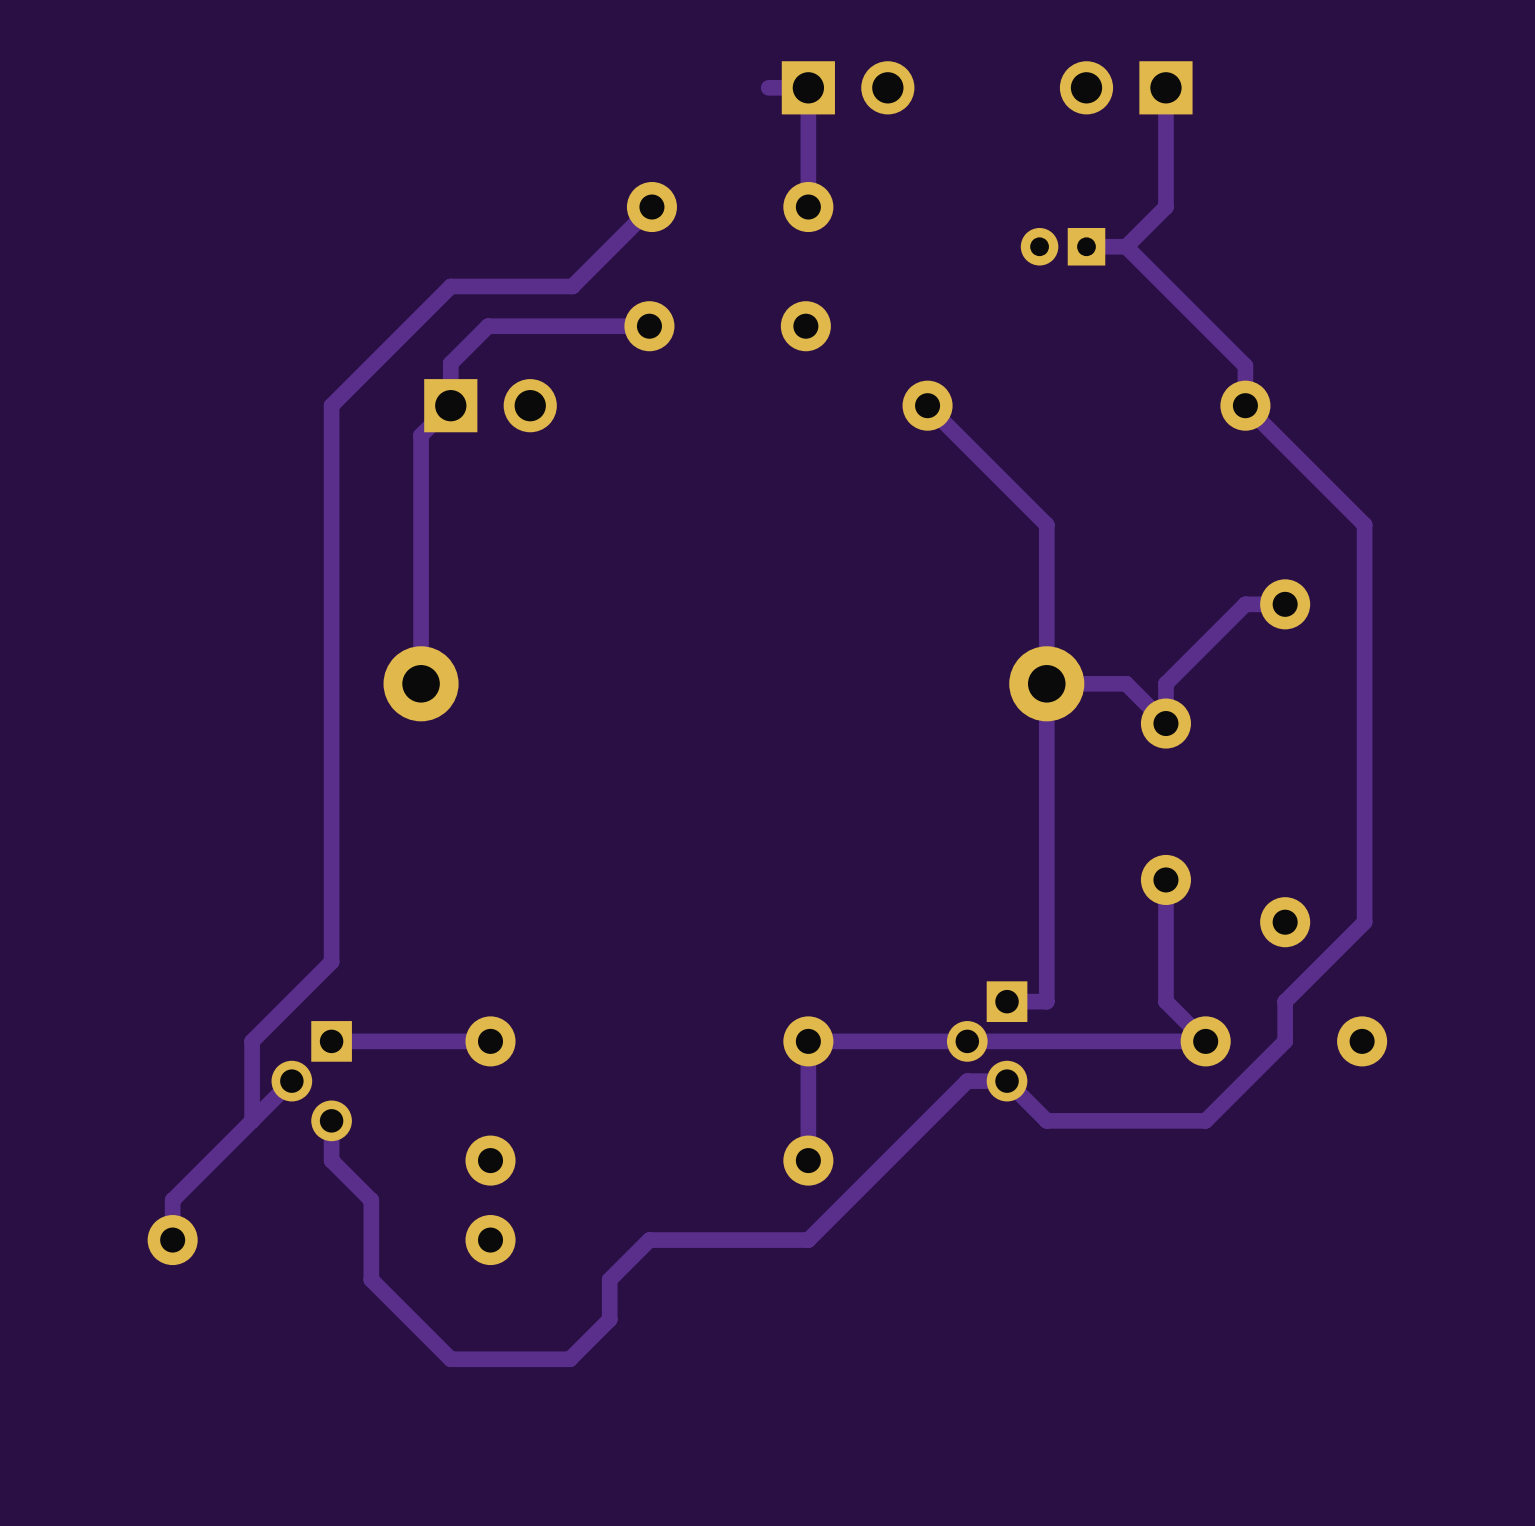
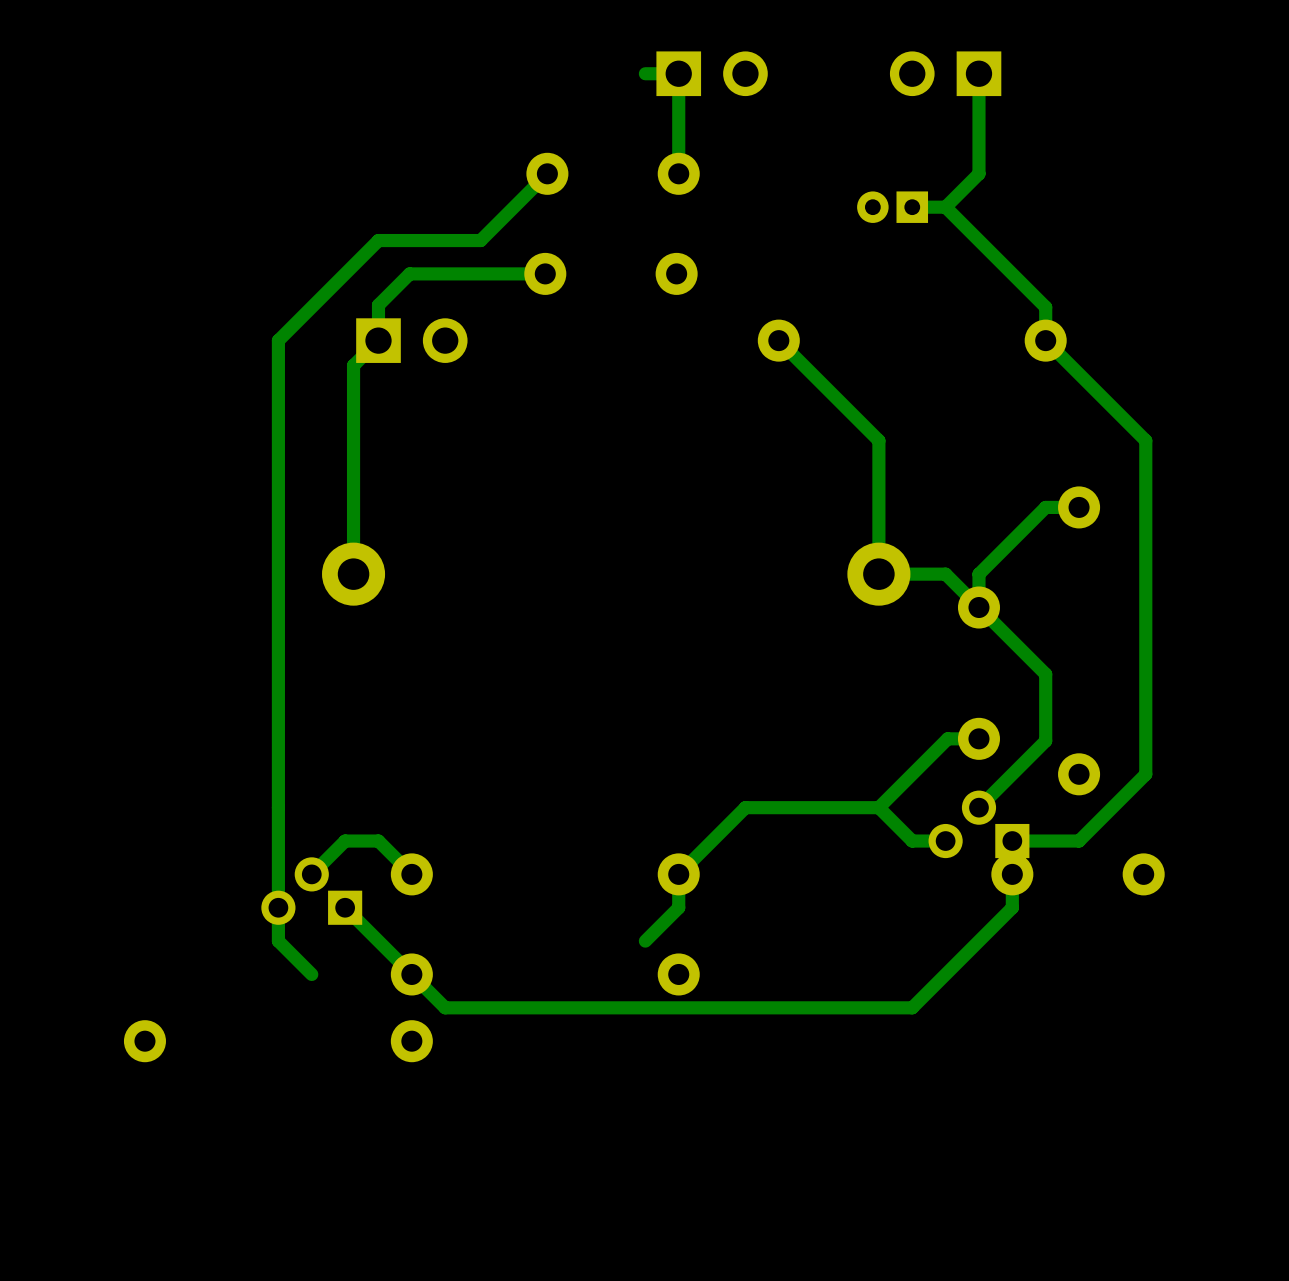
track: (1046, 683) (1046, 1001) (1007, 1001) -> none
track: none -> (978, 607) (1045, 674) (1045, 740) (978, 807)
track: (1165, 879) (1165, 1001) (1205, 1041) (808, 1041) -> (878, 807) (745, 807) (678, 874)
track: none -> (978, 738) (947, 738) (878, 807)
track: (331, 961) (252, 1041) (252, 1120) -> (278, 807) (278, 941) (311, 974)
track: none -> (878, 807) (912, 841) (945, 841)
track: (1285, 1001) (1285, 1041) (1205, 1120) (1046, 1120) (1007, 1081) (967, 1081) (808, 1240) (649, 1240) (609, 1279) (609, 1319) (569, 1359) (450, 1359) (371, 1279) (371, 1200) (331, 1160) (331, 1120) -> (1079, 841) (1012, 841) (1012, 907) (912, 1007) (445, 1007) (345, 907)
track: (490, 1041) (331, 1041) -> (411, 874) (378, 841) (345, 841) (311, 874)
part rotation: 0° (987, 1041) -> 90° clockwise (978, 824)
part position: (987, 1041) -> (978, 824)
track: (291, 1081) (172, 1200) (172, 1240) -> none
part rotation: 0° (311, 1081) -> 90° clockwise (311, 891)
track: (808, 1081) (808, 1160) -> (678, 907) (645, 941)

